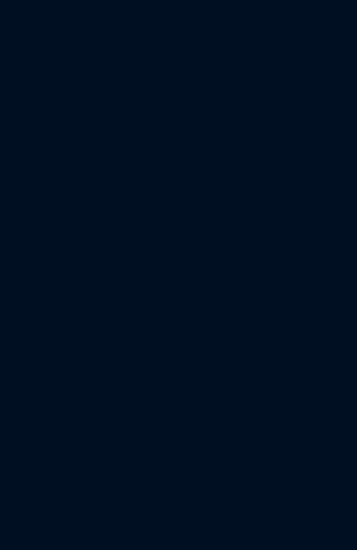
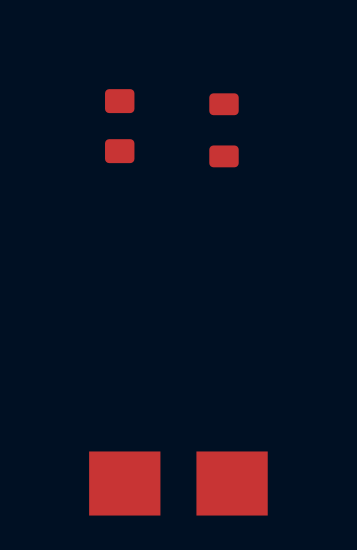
part: none -> (119, 126)
part: none -> (224, 130)
part: none -> (178, 483)

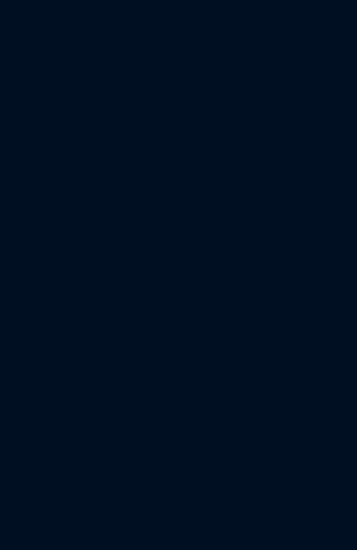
part: (119, 126) -> none
part: (224, 130) -> none
part: (178, 483) -> none

